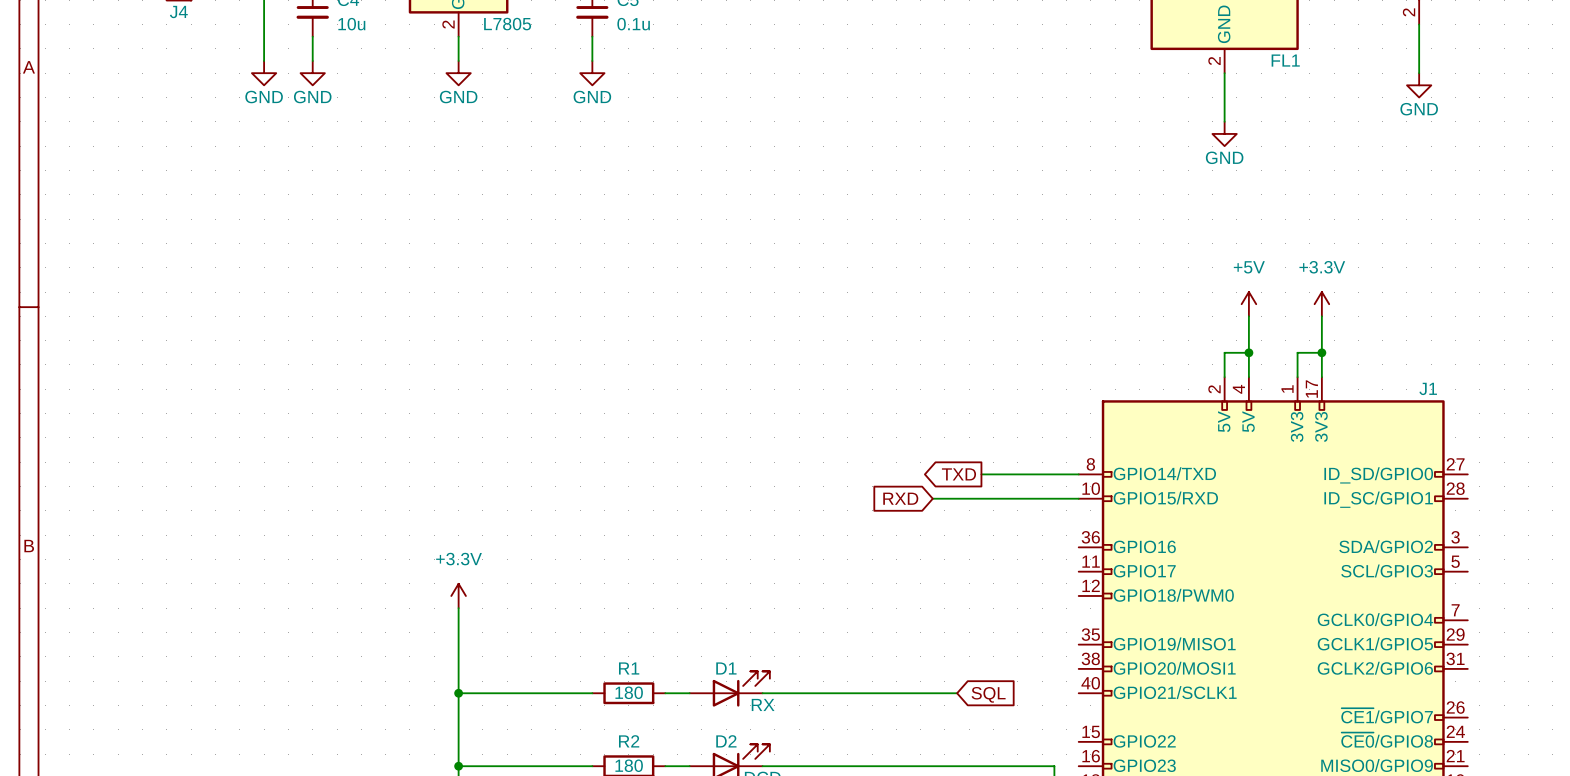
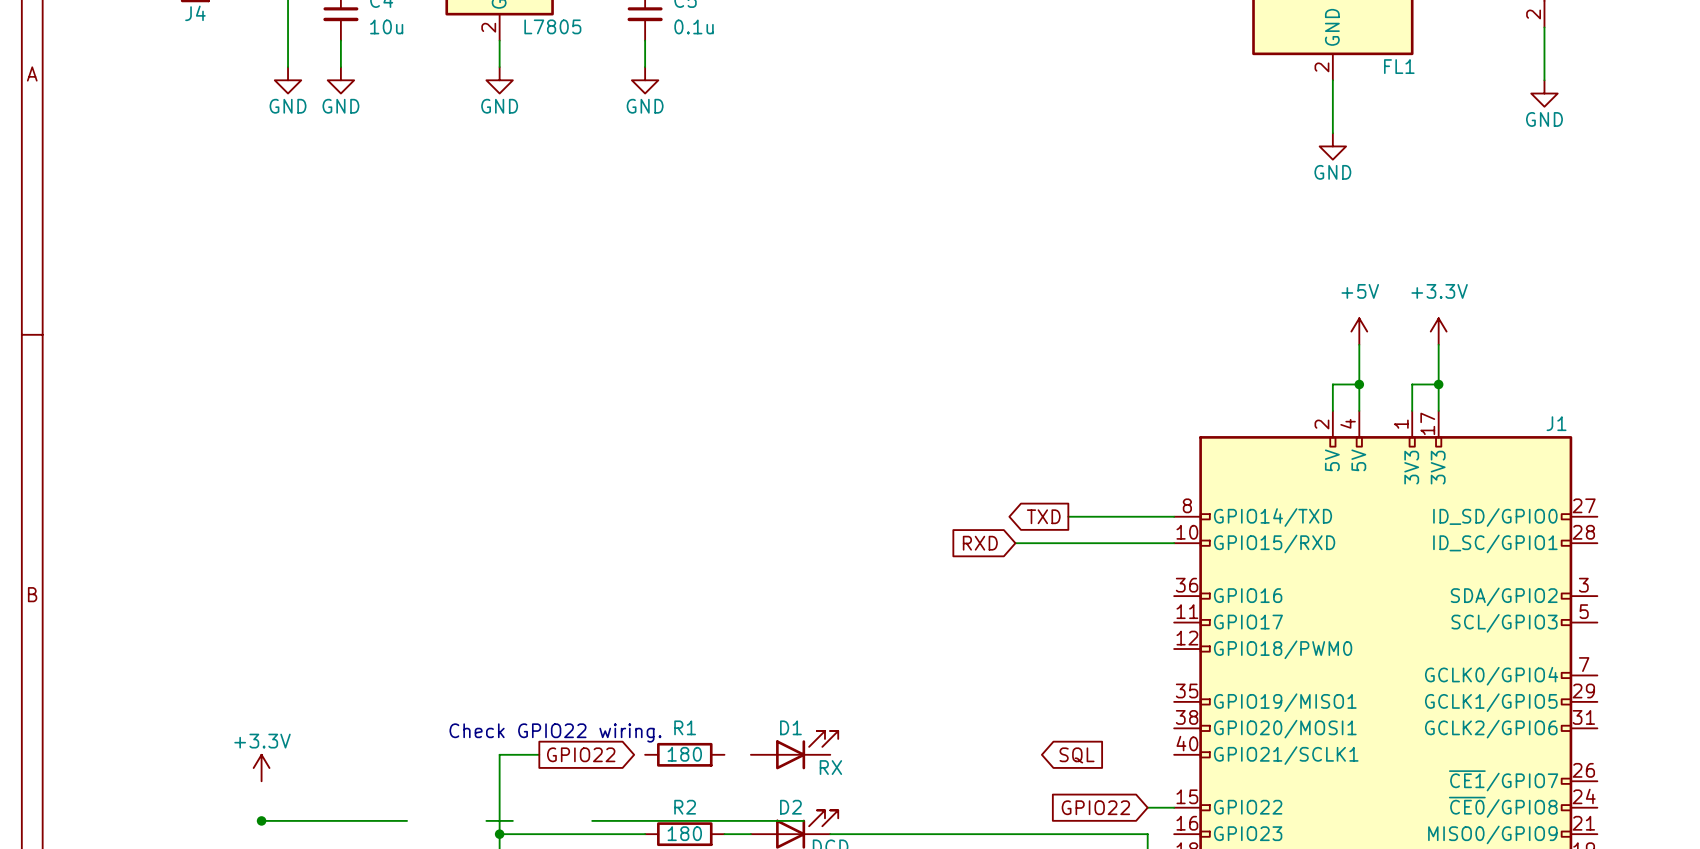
power symbol: +3.3V (458, 595) -> none
wire: (458, 608) (458, 693) -> none
text: none -> Check GPIO22 wiring. (555, 732)
junction: (458, 693) -> none
wire: (495, 693) (592, 693) -> none
global label: none -> GPIO22 (581, 754)
wire: (665, 693) (689, 693) -> (486, 820) (512, 820)
wire: (762, 693) (957, 693) -> (592, 820) (803, 820)
power symbol: none -> +3.3V (261, 768)
global label: none -> GPIO22 (1095, 807)
wire: none -> (1147, 807) (1174, 807)
wire: none -> (261, 820) (407, 820)
junction: none -> (261, 820)

